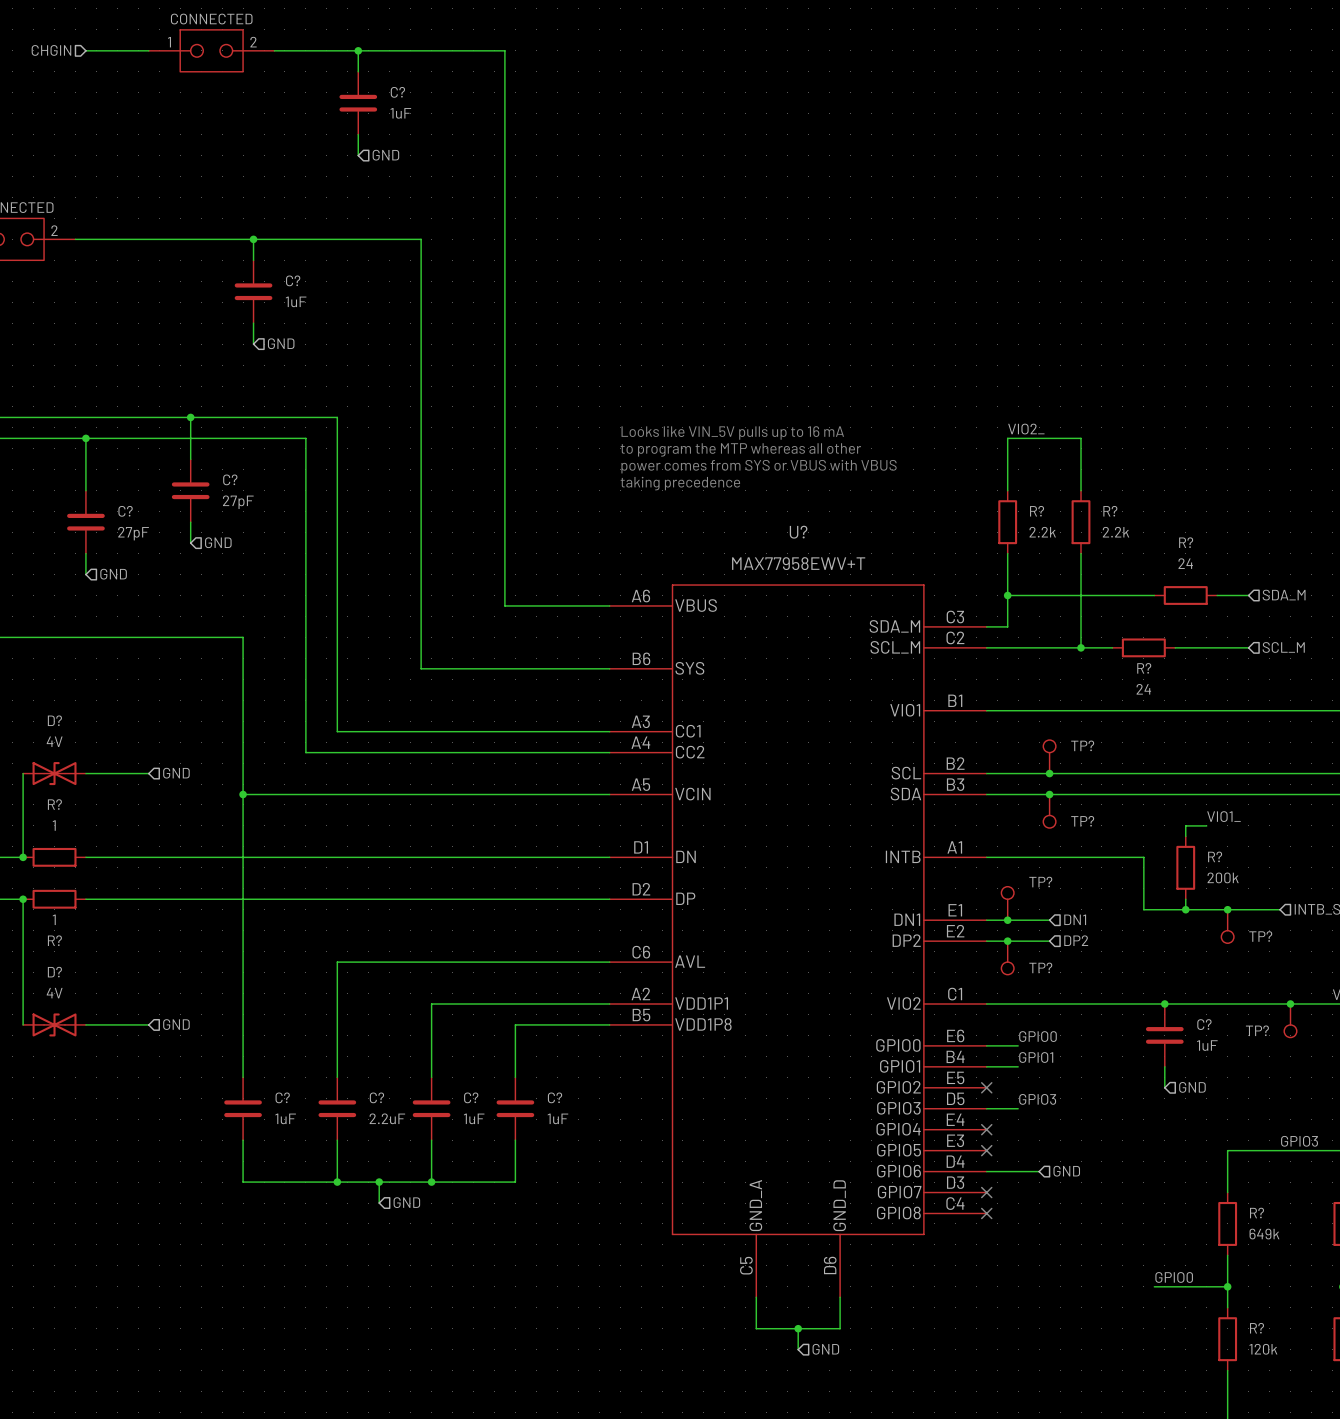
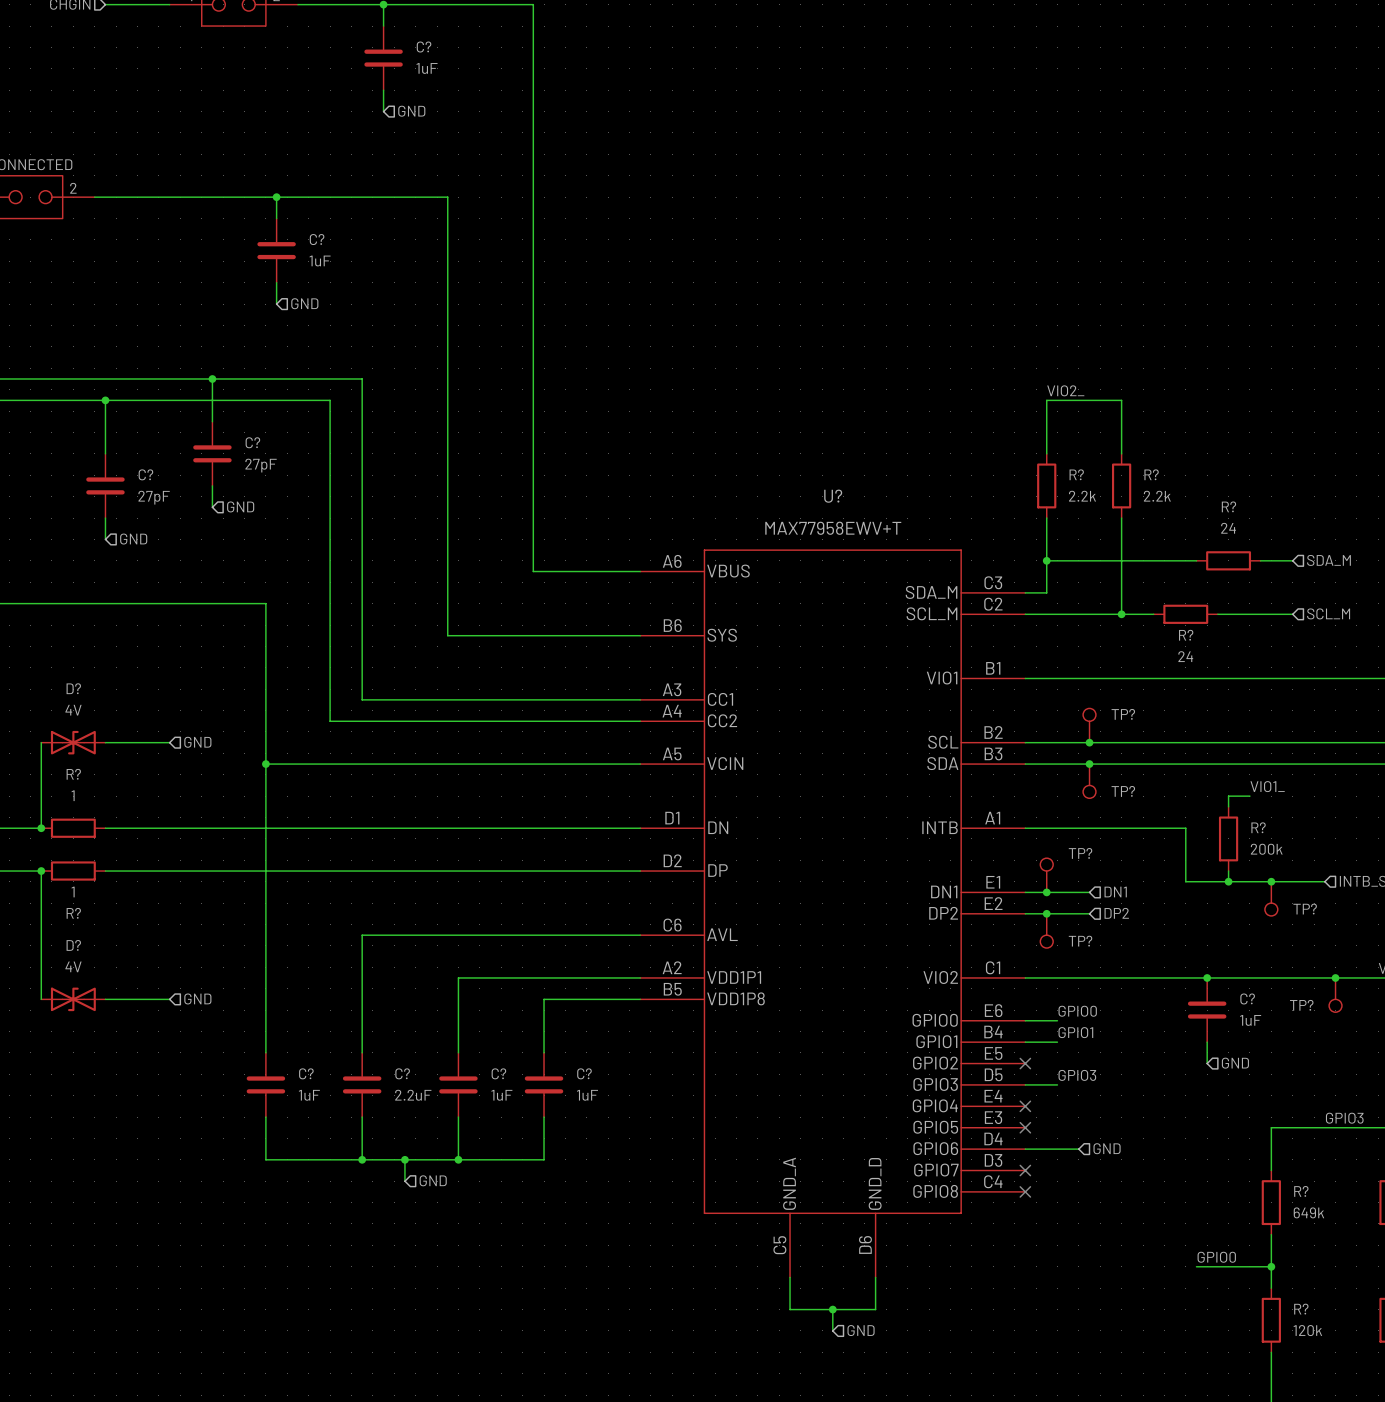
text: Looks like VIN_5V pulls up to 16 mA (732, 432) -> none
text: to program the MTP whereas all other (740, 449) -> none
text: power comes from SYS or VBUS with VBUS (759, 466) -> none
text: taking precedence (680, 483) -> none

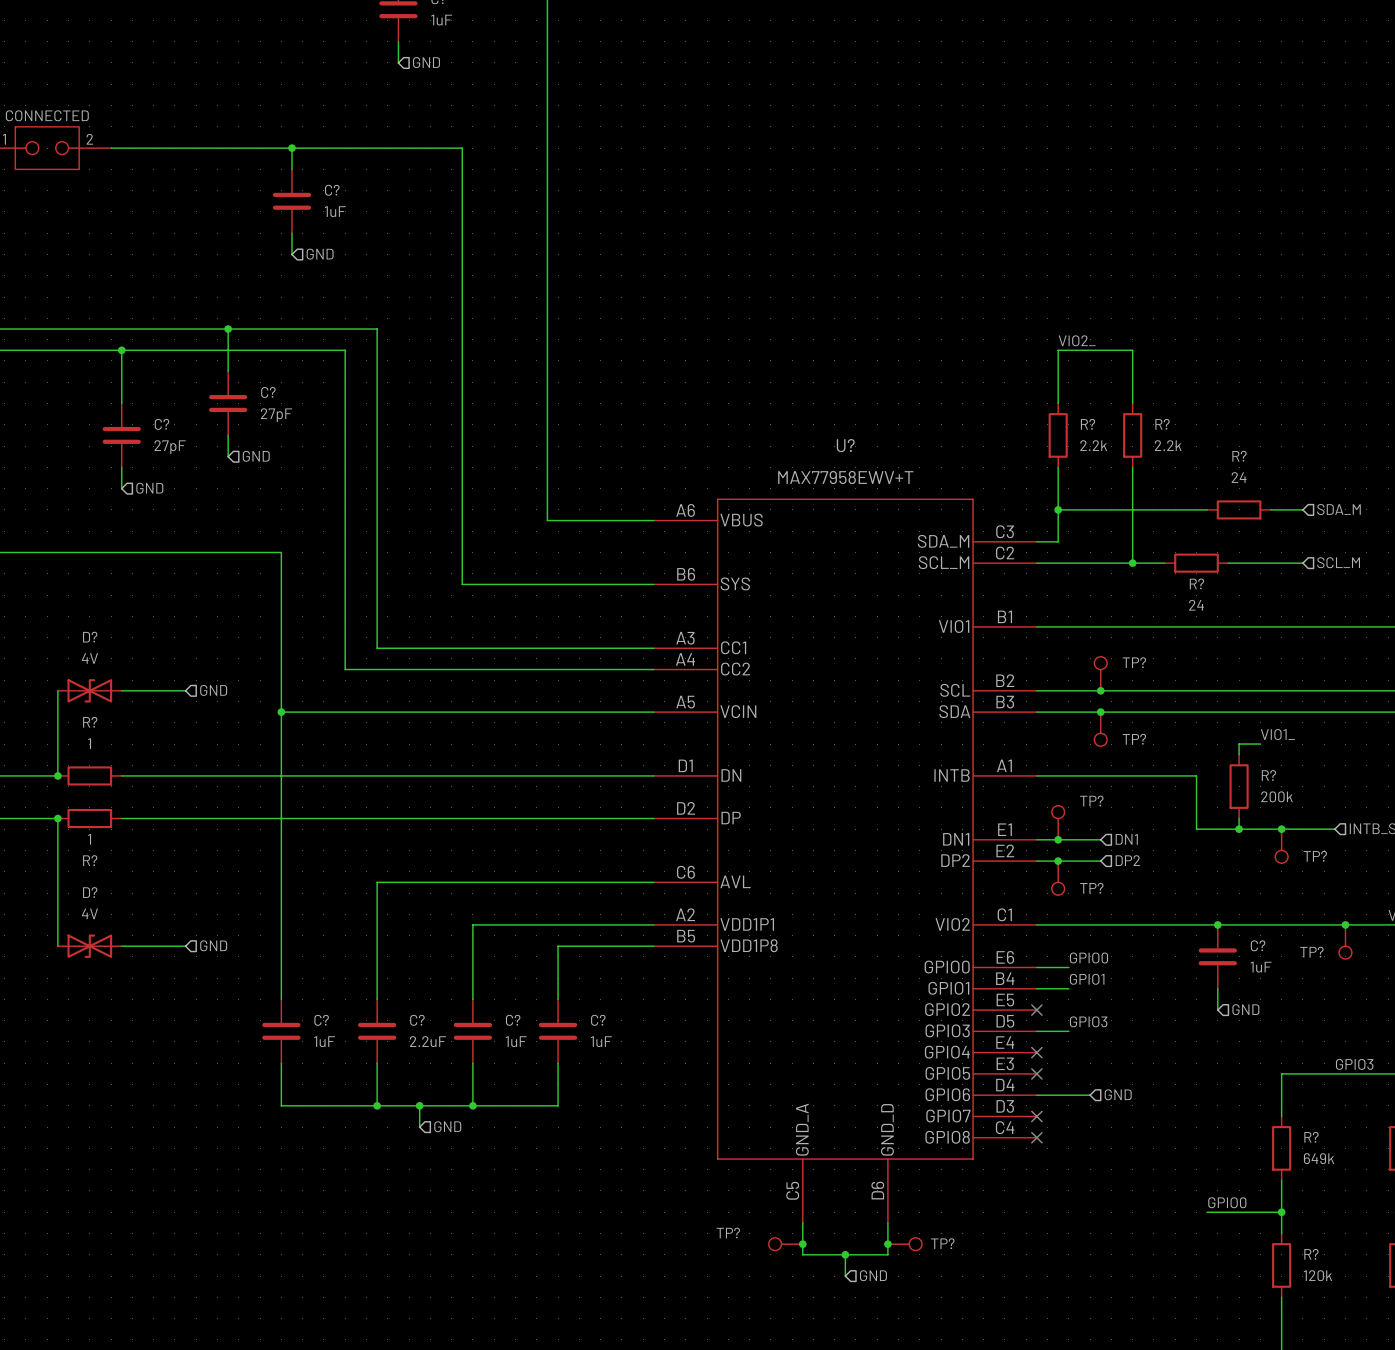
TP?: none -> (785, 1244)
junction: none -> (802, 1244)
junction: none -> (887, 1244)
TP?: none -> (904, 1244)

